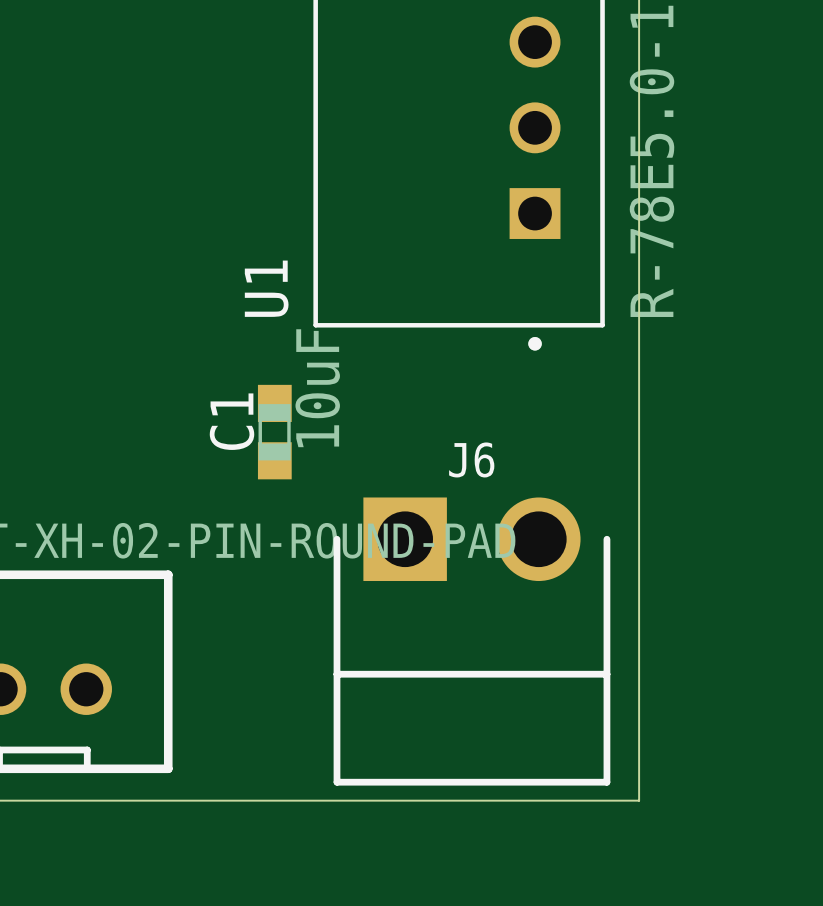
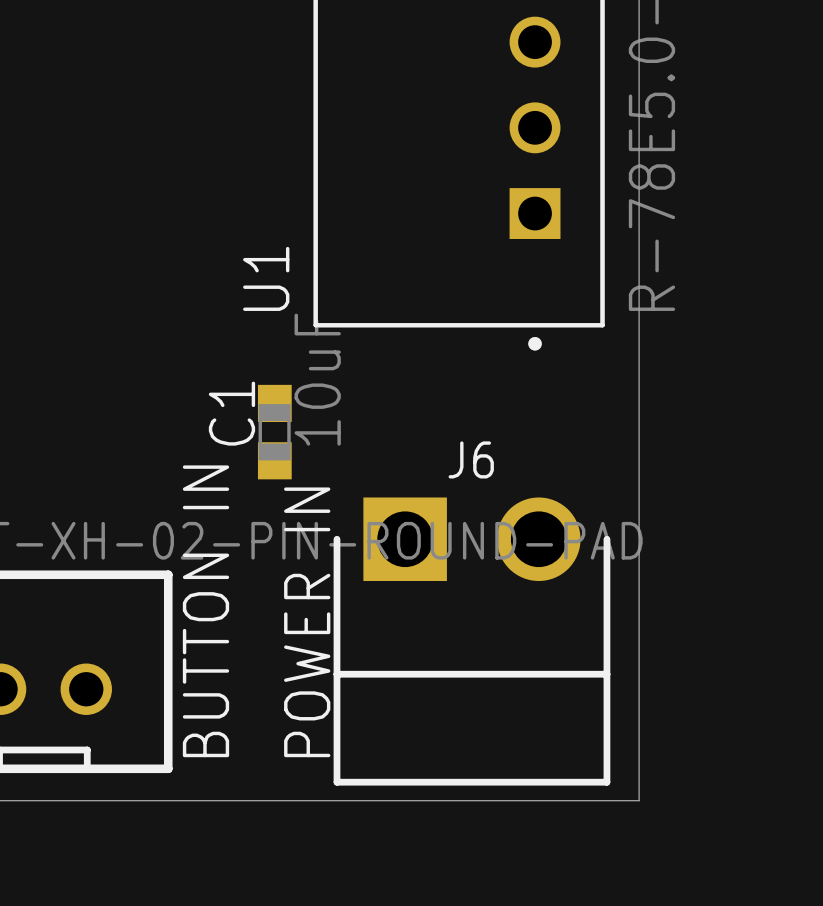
text: none -> BUTTON IN (205, 611)
text: none -> POWER IN (307, 622)

